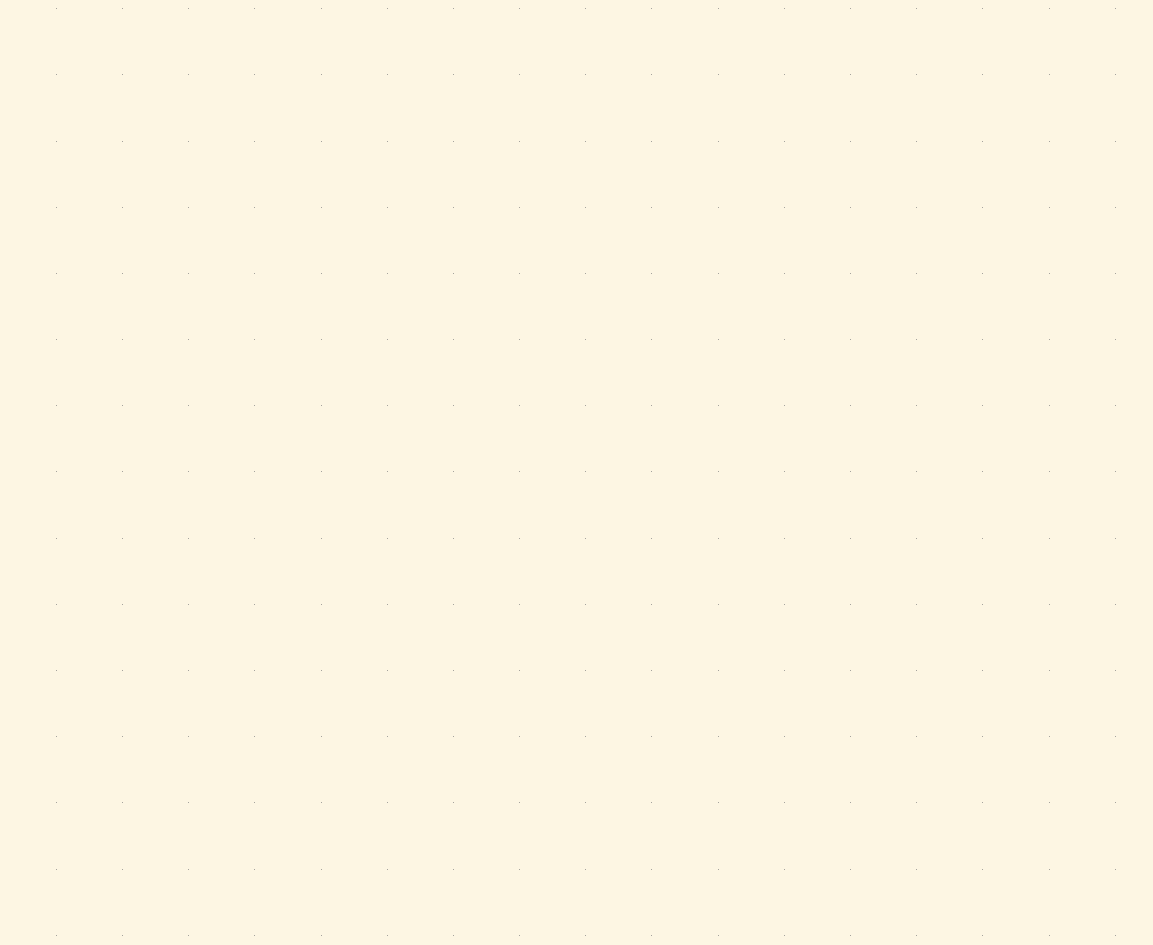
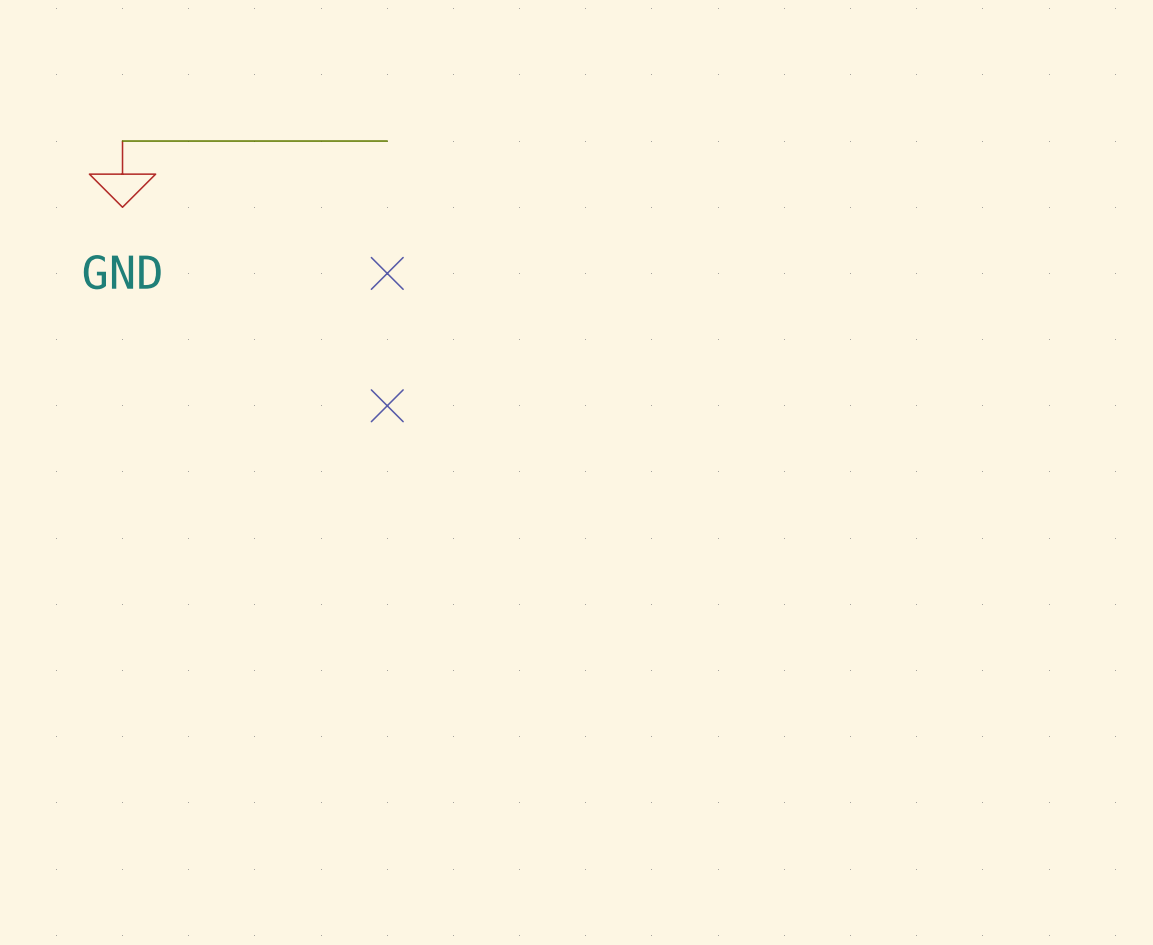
wire: none -> (122, 141) (387, 141)
power symbol: none -> GND (122, 174)
no-connect mark: none -> (387, 273)
no-connect mark: none -> (387, 405)

